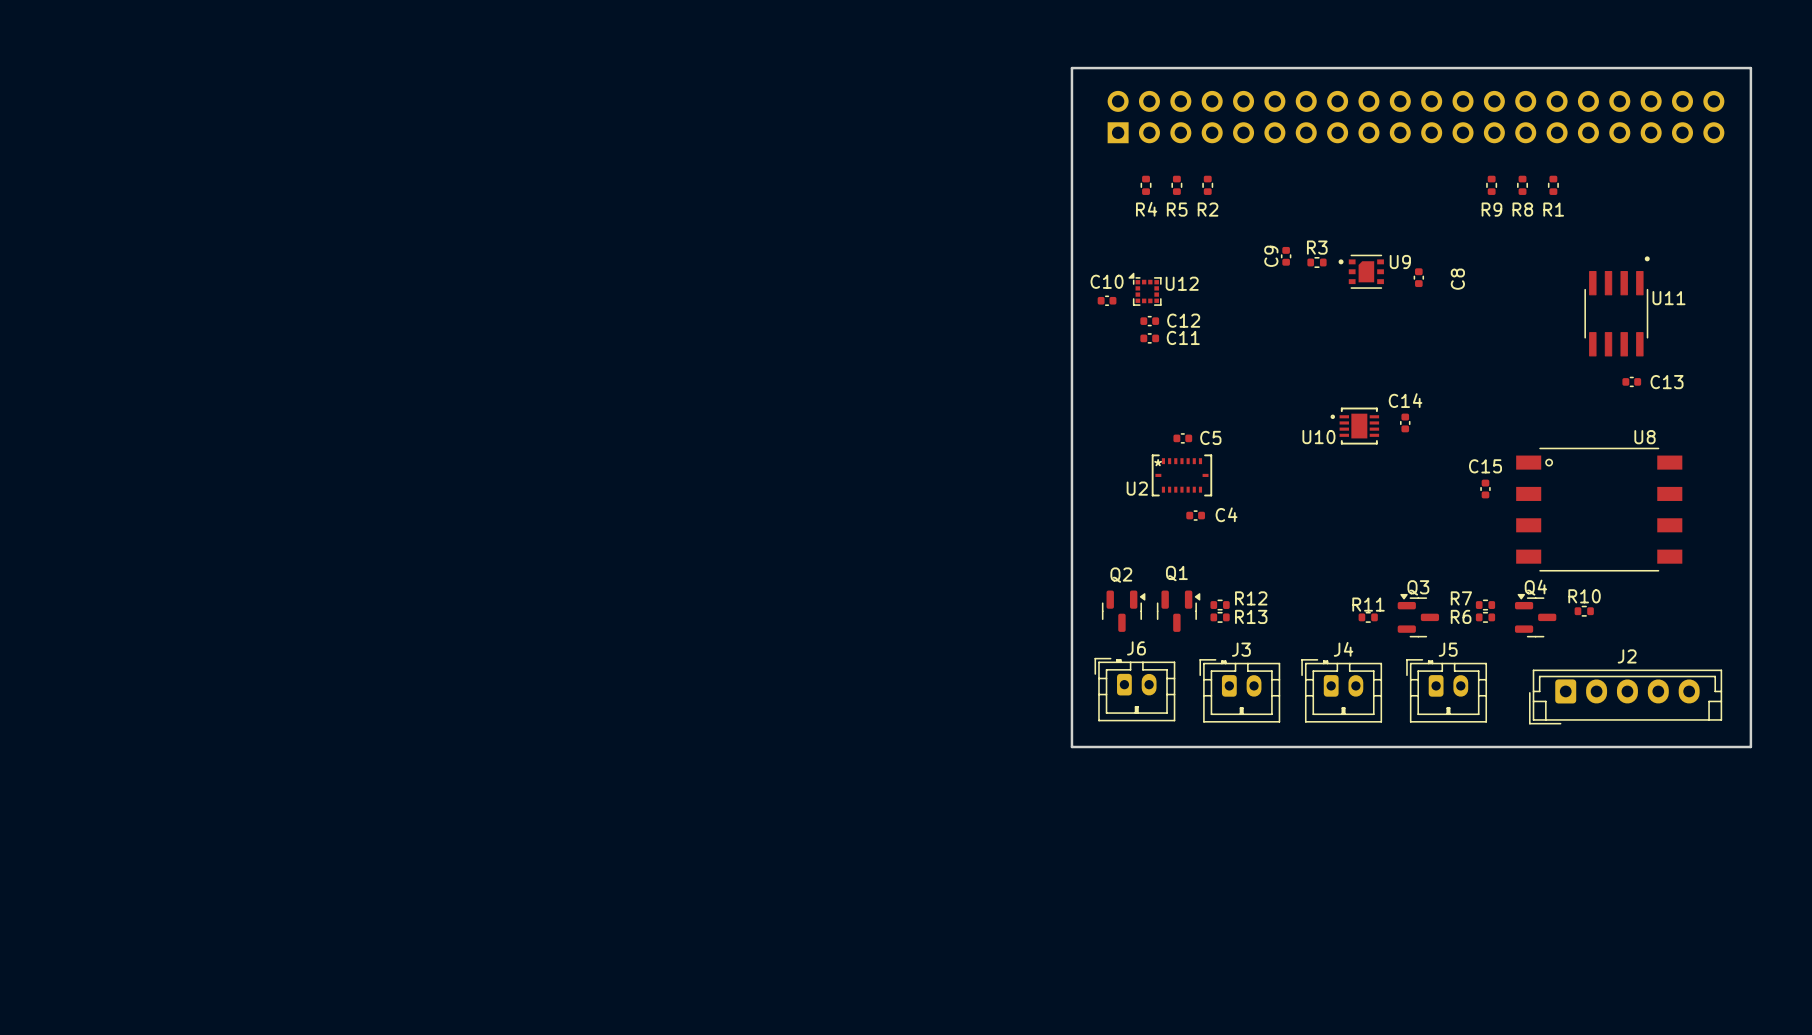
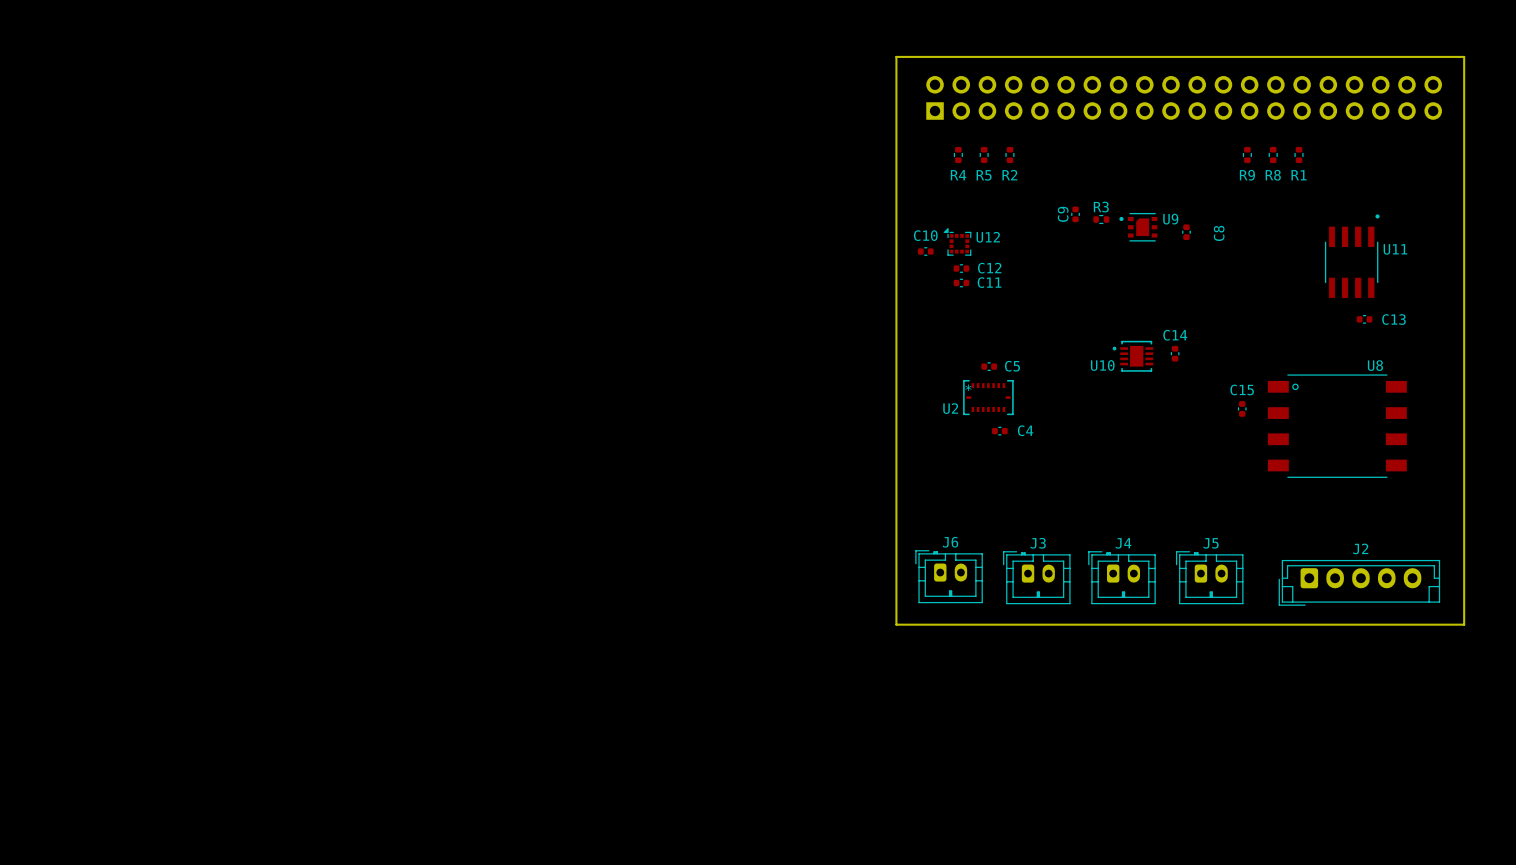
R12: (1220, 605) -> none
R7: (1485, 605) -> none
Q2: (1123, 611) -> none
Q1: (1178, 611) -> none
R10: (1584, 611) -> none
Q3: (1418, 615) -> none
Q4: (1535, 615) -> none
R13: (1220, 617) -> none
R11: (1368, 617) -> none
R6: (1485, 617) -> none

